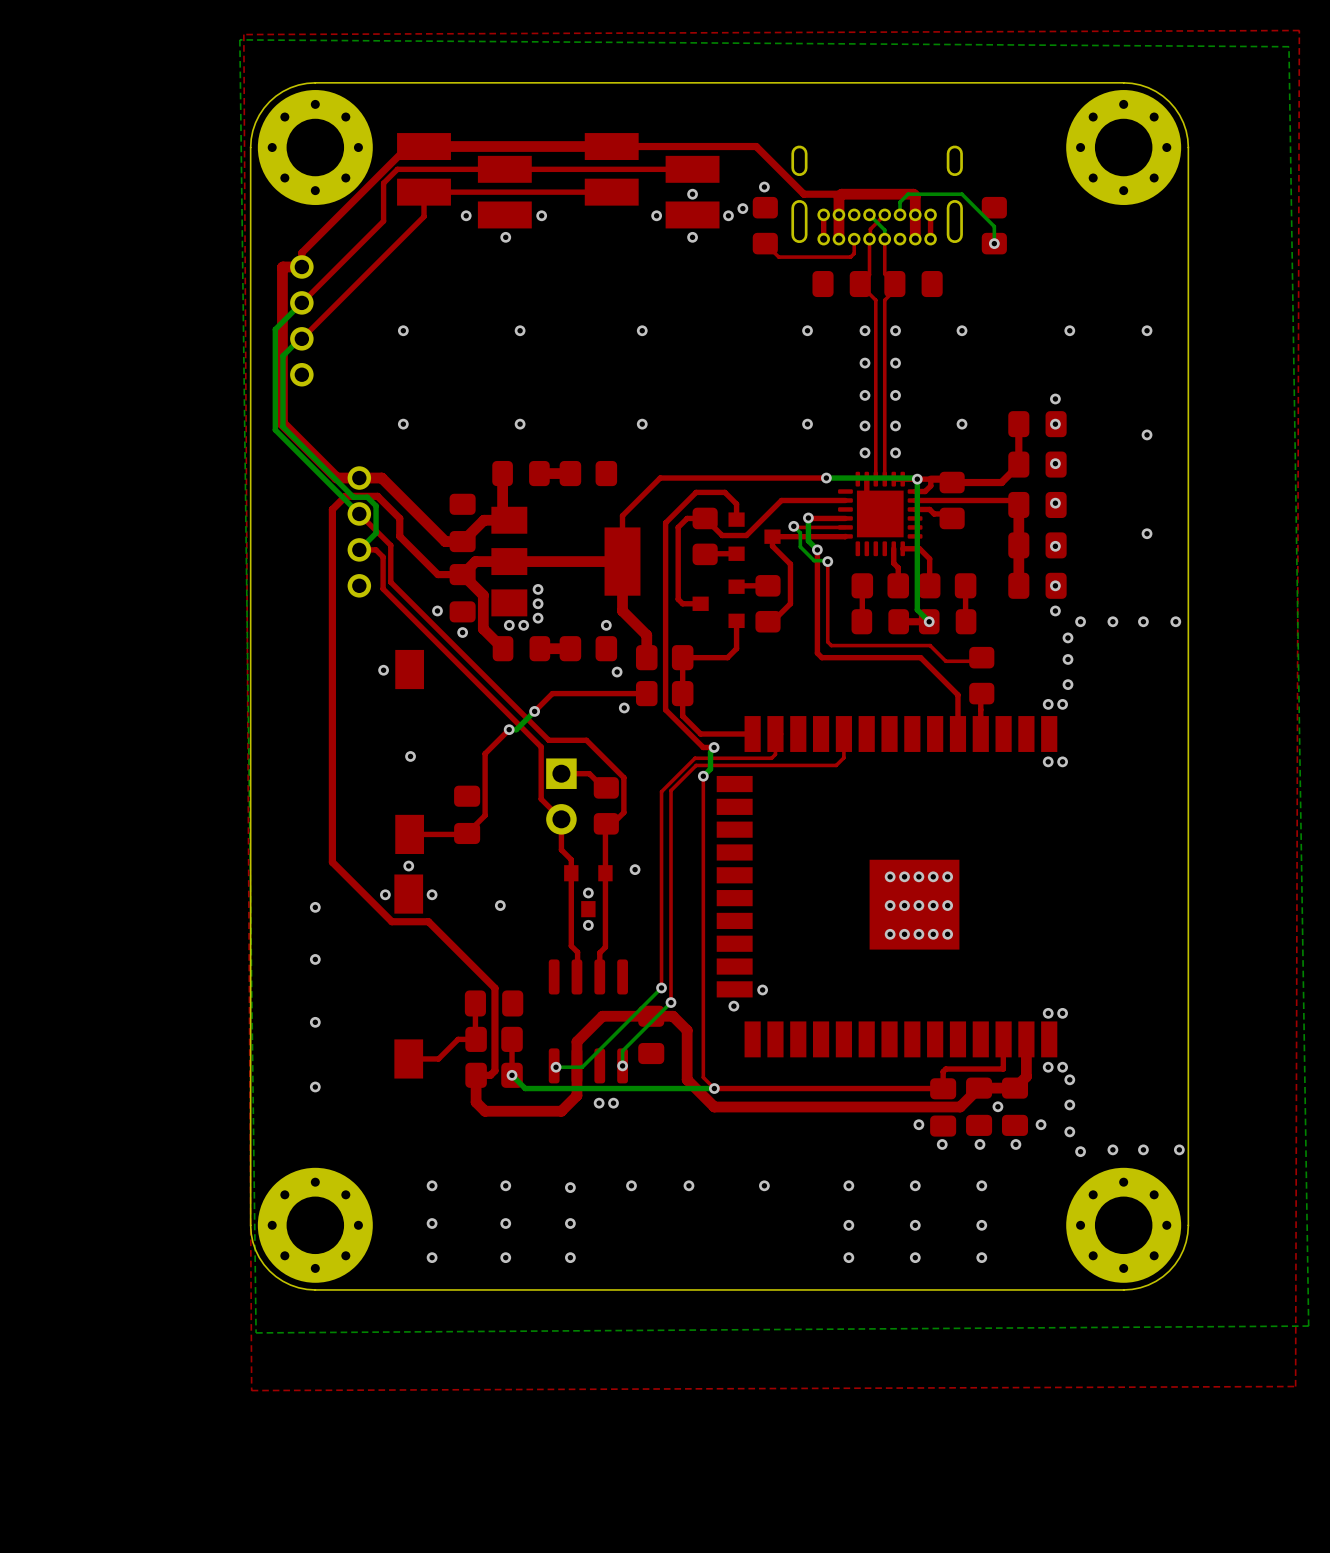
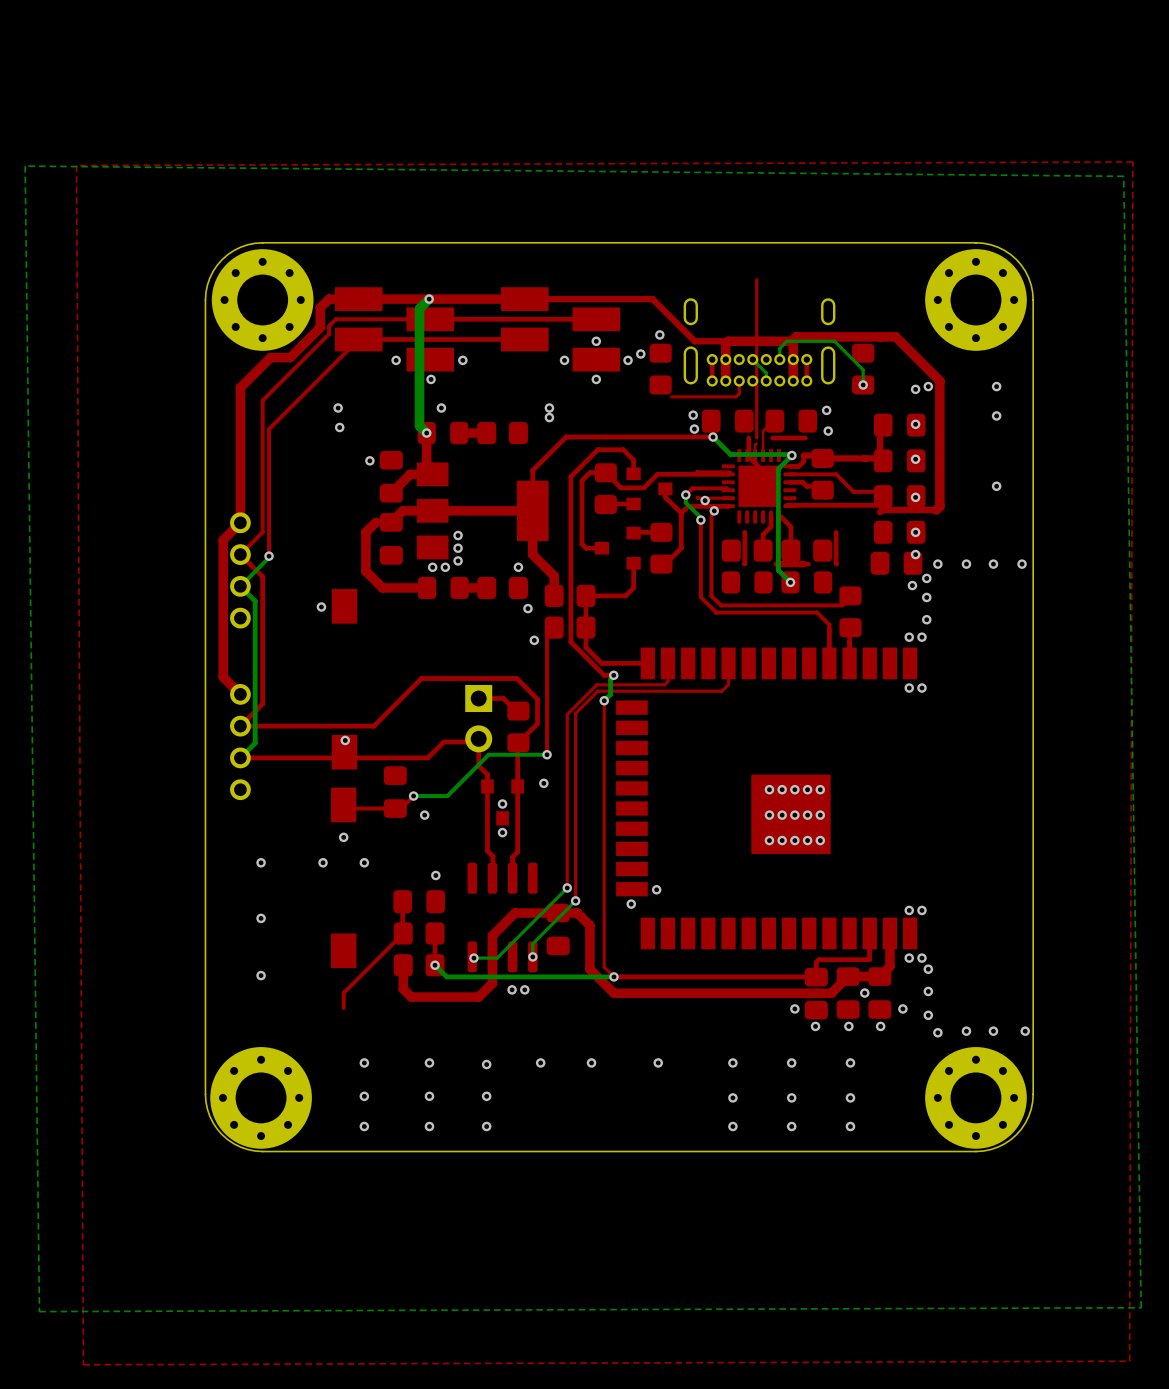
top zone outline: (1299, 30) (1295, 1386) (251, 1390) (243, 34) (1299, 30) -> (1132, 161) (1129, 1361) (83, 1364) (76, 165) (1132, 161)
bottom zone outline: (239, 39) (1288, 46) (1308, 1326) (256, 1332) (239, 39) -> (25, 166) (1123, 176) (1141, 1307) (39, 1311) (25, 166)
part: (315, 147) -> none
part position: (1123, 147) -> (975, 299)
top track: (692, 169) (397, 169) (383, 183) (383, 221) (301, 302) (308, 309) -> none
part: (464, 180) -> none
part: (652, 180) -> none
via: (764, 187) -> none
top track: (611, 192) (424, 192) (424, 216) (301, 338) -> none
via: (692, 194) -> none
top track: (841, 194) (838, 196) (838, 239) -> (728, 341) (725, 343) (725, 381)
top track: (841, 194) (803, 194) (756, 146) (408, 146) (301, 252) (301, 266) (282, 267) (282, 423) (336, 478) (381, 478) (445, 541) (462, 541) -> none
top track: (841, 194) (913, 194) (915, 196) (915, 239) -> none
part position: (877, 195) -> (759, 342)
via: (742, 208) -> none
top track: (823, 214) (823, 239) -> (712, 359) (712, 381)
bottom track: (869, 214) (884, 230) (884, 239) -> (752, 359) (766, 373) (766, 381)
top track: (884, 214) (870, 229) (869, 239) -> none
bottom track: (900, 214) (900, 202) (908, 194) (962, 194) (994, 226) (994, 243) -> (779, 359) (779, 348) (786, 341) (834, 341) (863, 369) (863, 384)
top track: (930, 214) (930, 239) -> (806, 359) (806, 381)
via: (466, 215) -> none
via: (541, 215) -> none
via: (656, 215) -> none
via: (728, 215) -> none
part: (765, 225) -> none
part: (994, 225) -> none
via: (505, 237) -> none
via: (692, 237) -> none
top track: (854, 239) (854, 253) (850, 257) (778, 257) (765, 243) -> none
top track: (869, 239) (869, 274) (860, 284) (875, 300) -> none
top track: (884, 239) (884, 273) (894, 284) (894, 290) (884, 300) (884, 479) -> none
via: (994, 243) -> none
part footprint: [290, 255, 314, 387] -> [211, 249, 314, 351]
board edge: none -> (262, 242) (983, 243) (1004, 250) (1021, 265) (1031, 285) (1033, 299)
part: (841, 284) -> none
part: (913, 284) -> none
bottom track: (301, 302) (275, 329) (275, 429) (359, 513) -> none
bottom track: none -> (429, 299) (419, 308) (419, 425) (426, 433)
board edge: (1188, 323) (1188, 147) (1186, 130) (1179, 115) (1169, 101) (1156, 91) (1140, 85) (1123, 82) (315, 82) (298, 85) (275, 96) (264, 108) (252, 130) (250, 147) (250, 1225) (252, 1242) (264, 1264) (282, 1281) (298, 1287) (315, 1289) (1123, 1289) (1148, 1285) (1169, 1271) (1183, 1250) (1187, 1233) (1188, 1221) -> (262, 242) (240, 247) (222, 259) (209, 278) (205, 299) (205, 1094) (209, 1116) (222, 1134) (240, 1147) (262, 1151) (975, 1151) (997, 1147) (1016, 1134) (1028, 1116) (1033, 1094)
via: (403, 330) -> none
via position: (520, 330) -> (429, 299)
via: (642, 330) -> none
via: (807, 330) -> none
via: (865, 330) -> none
via: (895, 330) -> none
via: (962, 330) -> none
via: (1069, 330) -> none
via: (1147, 330) -> none
bottom track: (301, 338) (282, 355) (282, 426) (353, 497) (367, 497) (376, 505) (376, 533) (359, 549) -> none
part: none -> (394, 329)
part: none -> (560, 329)
via: none -> (659, 334)
via: (865, 363) -> none
via: (895, 363) -> none
top track: none -> (524, 339) (358, 339) (269, 429) (269, 556)
via: none -> (596, 341)
top track: none -> (728, 341) (694, 341) (652, 299) (329, 299) (320, 307) (320, 327) (290, 357) (270, 357) (240, 387) (240, 522) (223, 539) (223, 677) (240, 694)
top track: none -> (791, 341) (793, 342) (793, 381)
top track: none -> (791, 341) (796, 336) (895, 336) (939, 381) (939, 506) (936, 510) (882, 510) (880, 512)
top track: none -> (791, 341) (728, 341)
via: none -> (640, 354)
via: none -> (396, 360)
via: none -> (462, 360)
via: none -> (564, 360)
via: none -> (628, 360)
via: (865, 395) -> none
via: (895, 395) -> none
via position: (1055, 398) -> (928, 386)
part: none -> (660, 369)
part: none -> (863, 369)
via: none -> (431, 379)
via: none -> (596, 379)
top track: none -> (739, 381) (739, 393) (736, 396)
via: none -> (863, 384)
via: none -> (996, 386)
via position: (403, 424) -> (338, 408)
via: (520, 424) -> none
via: (642, 424) -> none
via: (807, 424) -> none
via: (962, 424) -> none
top track: (1018, 424) (1018, 465) (1001, 482) (952, 482) (948, 479) (930, 479) (930, 485) (925, 491) (915, 491) -> none
part: (1037, 424) -> none
via: (865, 425) -> none
via: (895, 425) -> none
top track: none -> (735, 396) (671, 396)
via: (1147, 434) -> none
via: none -> (441, 408)
via: none -> (549, 408)
via: none -> (826, 410)
via: (865, 452) -> none
via: (895, 452) -> none
via: none -> (693, 415)
via: none -> (996, 415)
via: none -> (549, 417)
top track: none -> (775, 418) (763, 430) (763, 455)
top track: none -> (880, 420) (880, 456) (877, 458) (822, 458) (819, 455) (803, 455) (803, 461) (798, 466) (789, 466)
part: none -> (727, 421)
part: none -> (791, 421)
via: none -> (339, 427)
via: none -> (694, 429)
via: none -> (828, 431)
via: none -> (426, 433)
bottom track: (826, 478) (917, 479) (917, 609) (929, 621) -> (713, 437) (730, 454) (791, 455) (778, 468) (778, 570) (790, 582)
via position: (917, 479) -> (791, 455)
top track: none -> (756, 443) (755, 455)
top track: (845, 500) (781, 500) (746, 535) -> (728, 474) (657, 474) (642, 487)
top track: (915, 500) (1014, 500) (1018, 504) (1018, 585) -> none
part position: (952, 500) -> (822, 474)
via: none -> (369, 460)
top track: (915, 509) (929, 509) (934, 513) (947, 513) (952, 518) -> (789, 482) (802, 482) (806, 486) (818, 486) (822, 490)
top track: (359, 513) (390, 545) (390, 582) (548, 740) (586, 740) (623, 777) (623, 812) (612, 823) (606, 823) -> (596, 319) (336, 319) (329, 326) (329, 334) (262, 400) (262, 532) (240, 554) (262, 576) (262, 703) (240, 726) (373, 726) (421, 678) (516, 678) (537, 699) (537, 723) (518, 742)
part position: (880, 513) -> (759, 486)
bottom track: (808, 517) (808, 540) (817, 549) -> none
via: (808, 517) -> none
top track: none -> (789, 474) (836, 474) (853, 491) (880, 491)
top track: (793, 526) (845, 527) -> none
bottom track: (793, 526) (800, 532) (800, 546) (814, 560) (827, 561) -> none
via: (793, 526) -> none
part position: (359, 531) -> (240, 570)
top track: (845, 536) (772, 536) -> none
top track: none -> (728, 490) (726, 488) (692, 488) (685, 494)
bottom track: none -> (685, 494) (685, 502) (700, 517) (700, 520)
via: none -> (685, 494)
top track: none -> (697, 497) (728, 498)
top track: (893, 548) (893, 563) (898, 567) (898, 585) -> none
top track: (902, 548) (919, 548) (929, 558) (929, 585) -> none
top track: (359, 549) (375, 549) (383, 557) (383, 588) (541, 747) (541, 799) (561, 819) -> (240, 757) (427, 757) (443, 742) (475, 742) (478, 738)
top track: (817, 549) (817, 653) (821, 657) (920, 657) (957, 694) -> (700, 520) (700, 597) (716, 612) (817, 612) (829, 624) (829, 628)
top track: none -> (874, 505) (786, 505)
top track: none -> (728, 506) (688, 506) (681, 513)
top track: (827, 561) (827, 641) (831, 645) (930, 645) (945, 661) (979, 661) -> (711, 515) (711, 595) (721, 605) (842, 605) (848, 599)
top track: none -> (771, 517) (771, 526) (763, 534) (763, 550)
top track: none -> (778, 517) (790, 526) (790, 550)
via: none -> (700, 520)
top track: (445, 574) (437, 574) (399, 536) (399, 518) (377, 496) (345, 496) (332, 509) (332, 862) (391, 921) (428, 921) (494, 988) (494, 1070) (490, 1075) (476, 1075) -> none
top track: (462, 574) (483, 595) (483, 628) (503, 648) -> (375, 522) (365, 532) (365, 571) (382, 587) (427, 587)
part position: (880, 585) -> (747, 550)
part position: (947, 585) -> (806, 550)
via: (437, 610) -> none
bottom track: none -> (269, 556) (240, 586) (255, 601) (255, 743) (240, 757)
via: none -> (269, 556)
part: none -> (896, 563)
part position: (880, 621) -> (747, 582)
via position: (929, 621) -> (790, 582)
part position: (947, 621) -> (806, 582)
via: (462, 632) -> none
via: none -> (912, 585)
top track: (646, 693) (552, 693) (534, 711) -> (554, 627) (547, 634) (547, 754)
bottom track: (534, 711) (516, 729) (509, 729) -> none
via: (534, 711) -> none
top track: (509, 729) (485, 753) (485, 815) (466, 834) (409, 834) -> none
via: (509, 729) -> none
via: (410, 756) -> none
part position: (467, 814) -> (395, 792)
via: none -> (345, 740)
part: none -> (240, 742)
bottom track: none -> (547, 754) (488, 754) (447, 796) (413, 796)
via: none -> (547, 754)
via: (408, 866) -> none
top track: none -> (413, 796) (401, 808) (344, 809)
via: none -> (413, 796)
via: (385, 894) -> none
via: (432, 894) -> none
via: (315, 907) -> none
via: none -> (343, 837)
via: none -> (323, 862)
via: none -> (364, 862)
via: none -> (435, 875)
top track: (476, 1039) (458, 1039) (438, 1058) (408, 1058) -> (403, 933) (343, 993) (343, 1007)

